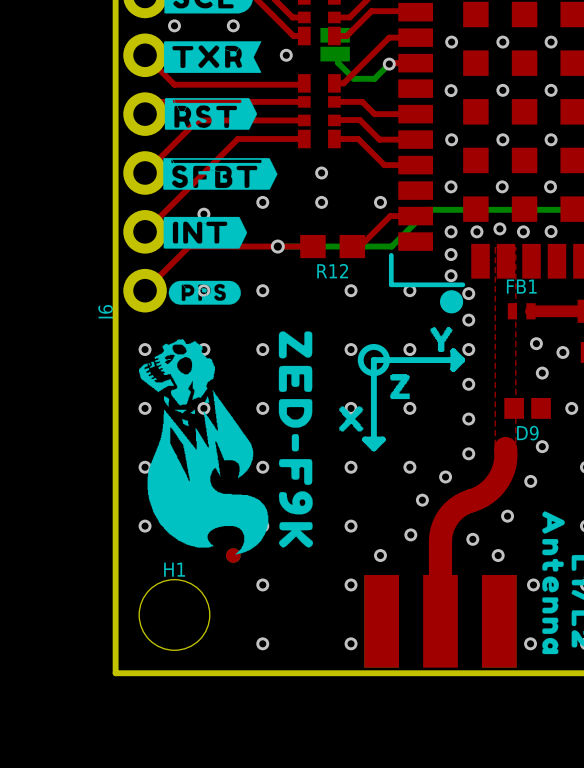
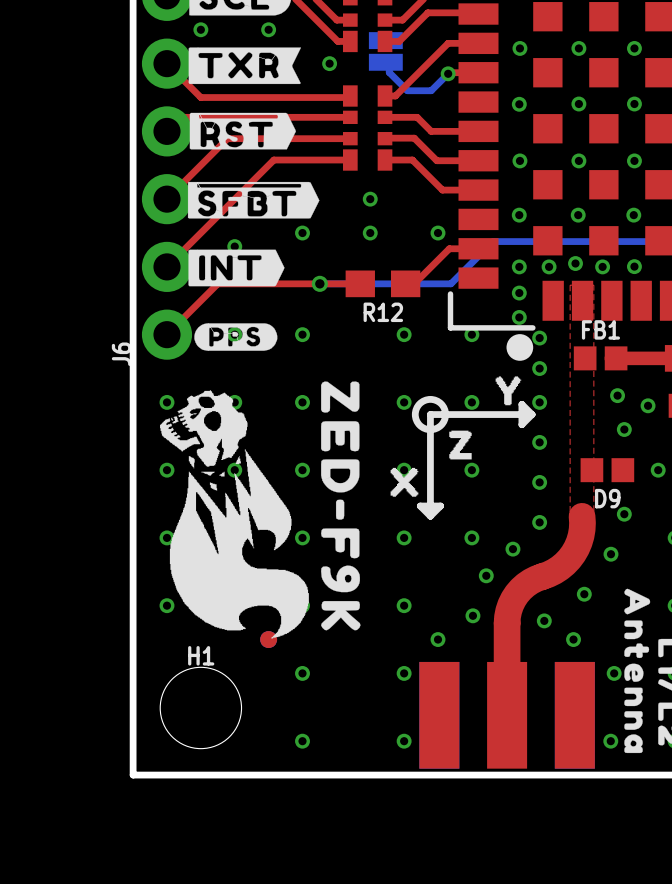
FB1 footprint: [507, 303, 536, 320] -> [573, 346, 628, 371]

